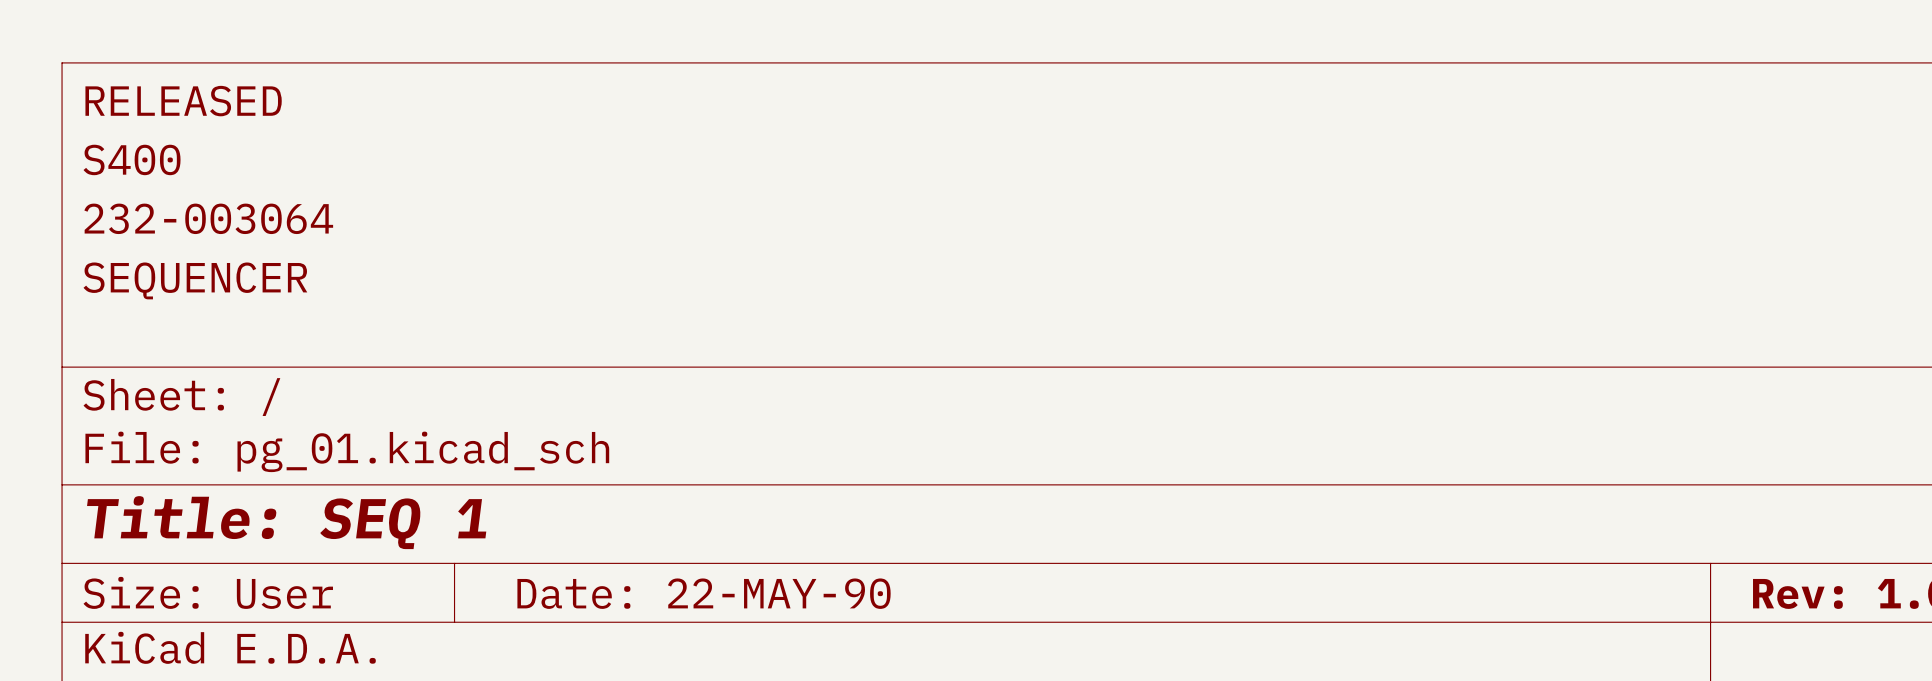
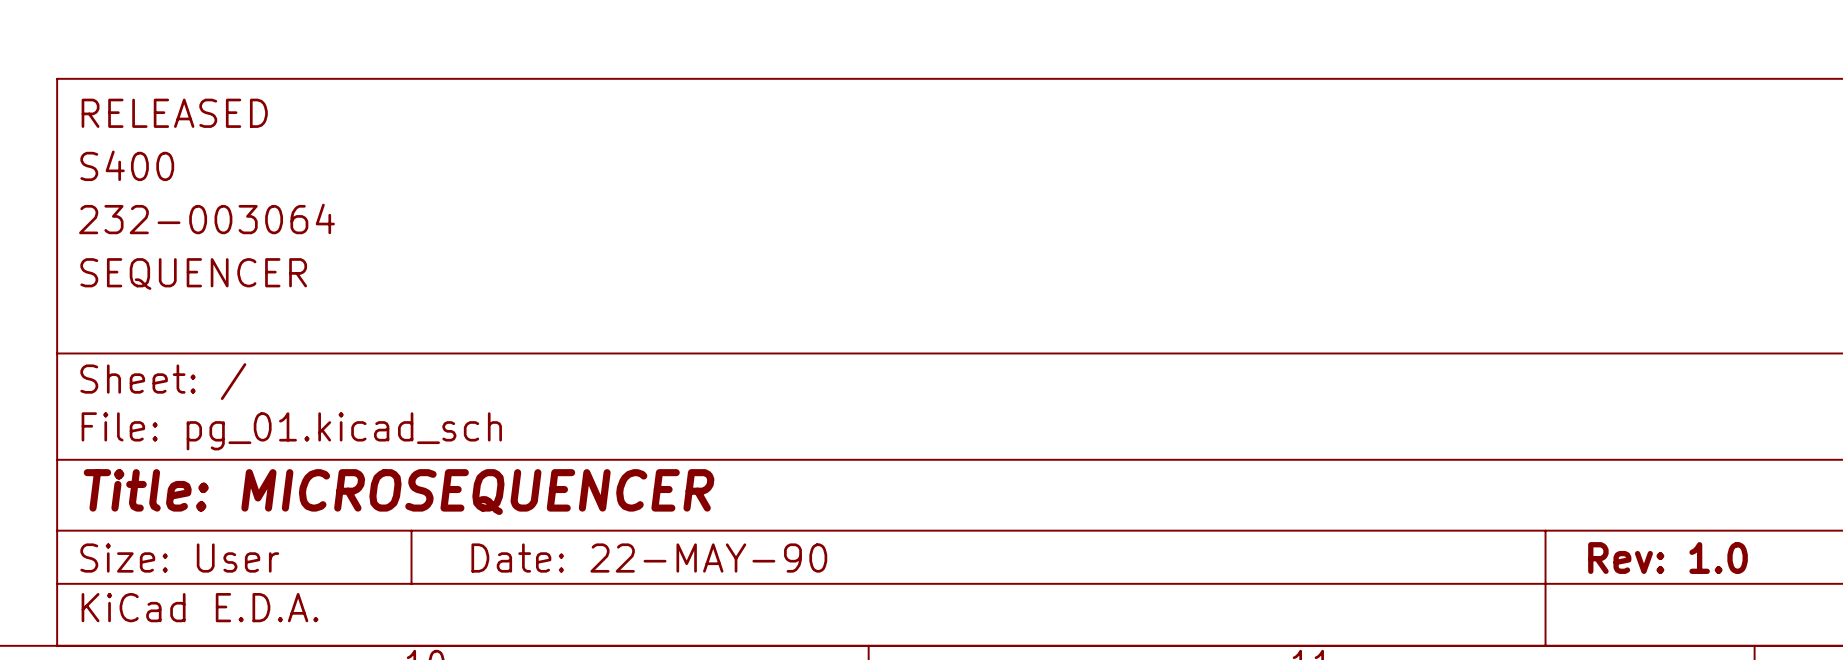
title block: Title: SEQ 1 (286, 522) -> Title: MICROSEQUENCER (399, 492)

